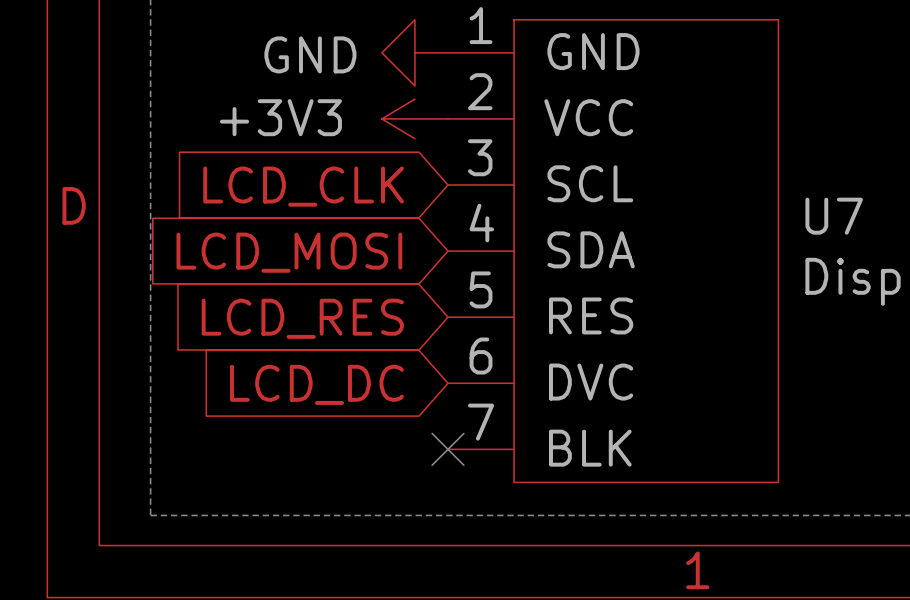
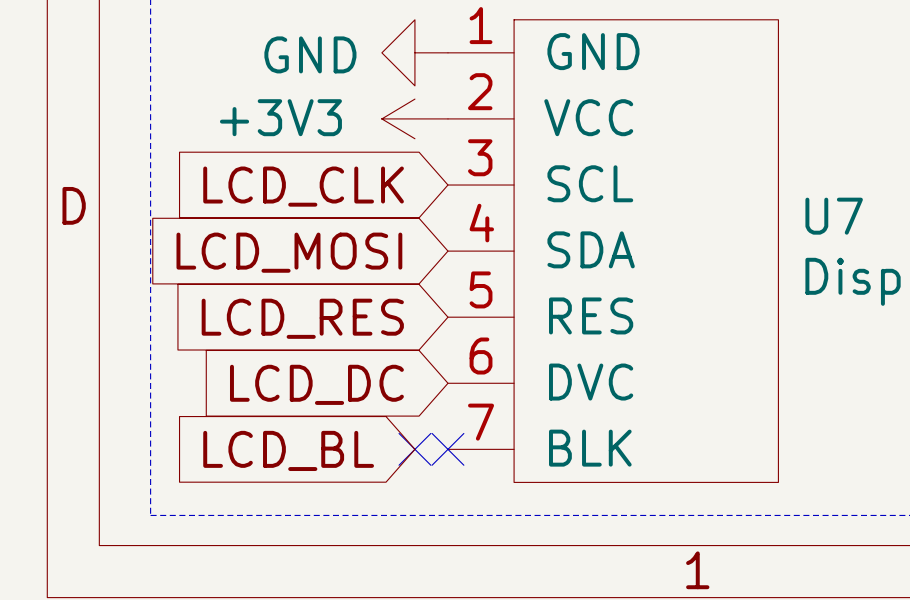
no-connect mark: none -> (414, 449)
global label: none -> LCD_BL (288, 450)

